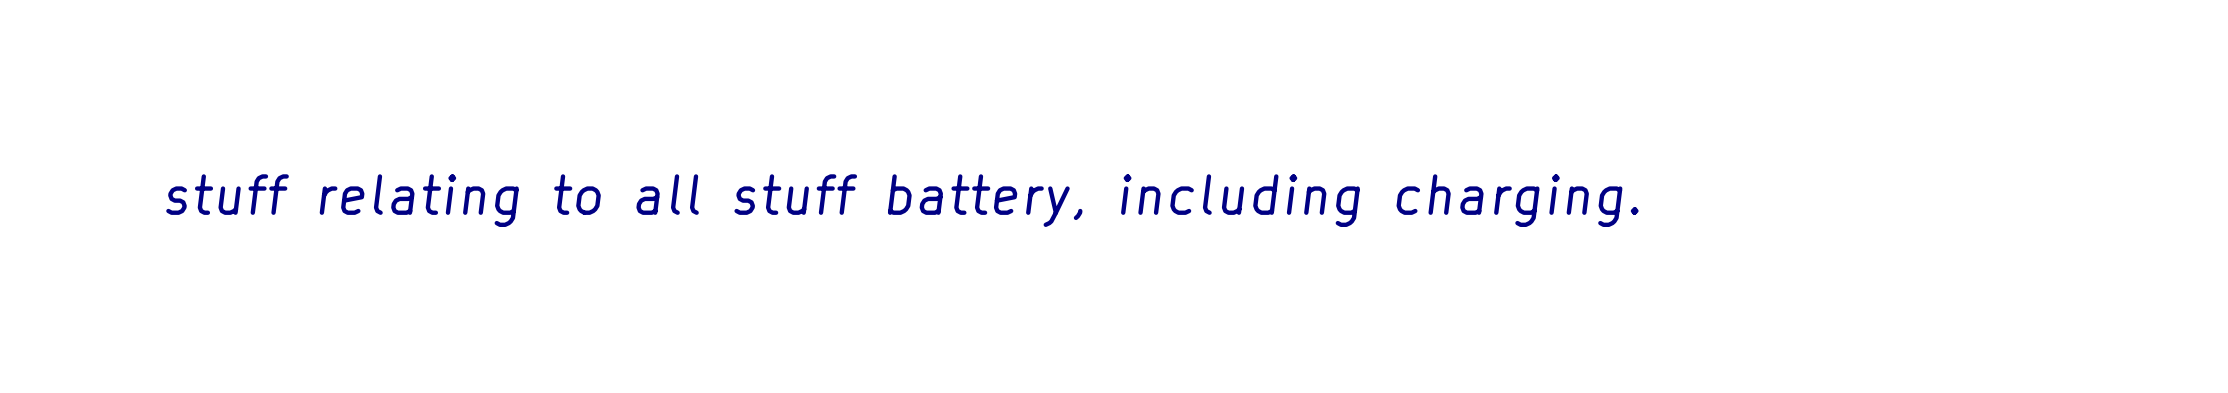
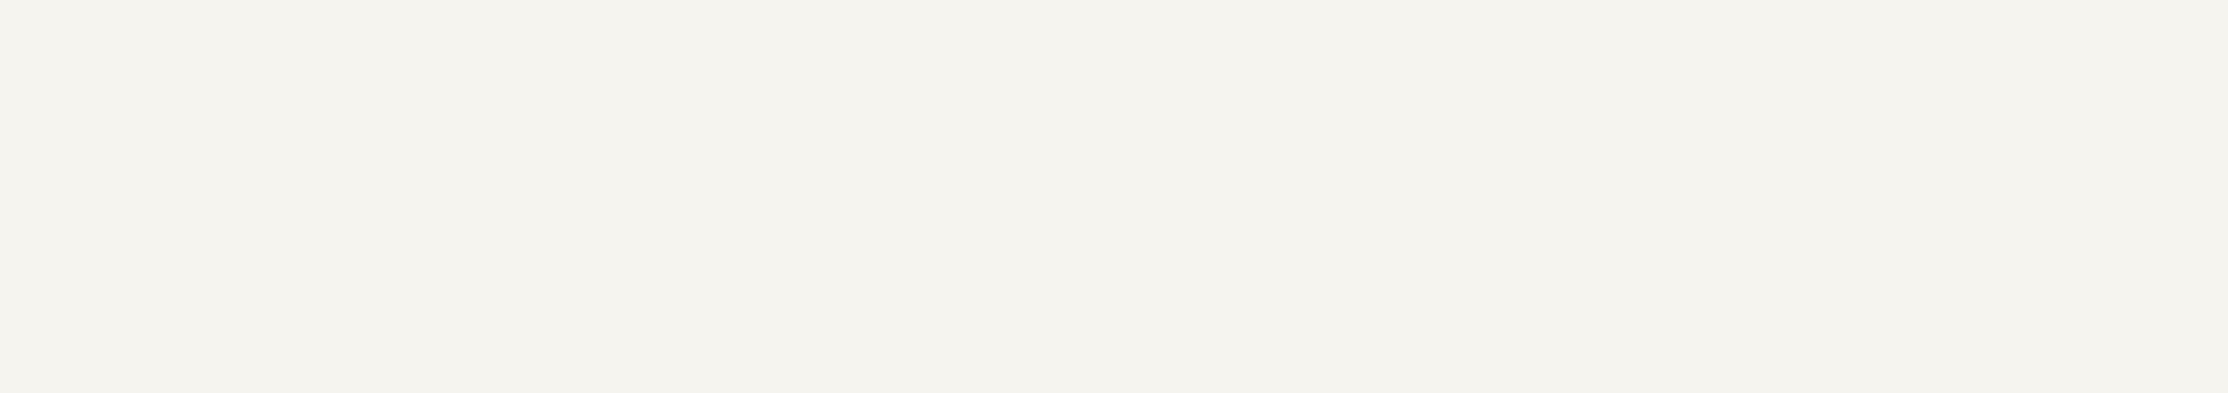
text: stuff relating to all stuff battery, including charging. (902, 200) -> none

